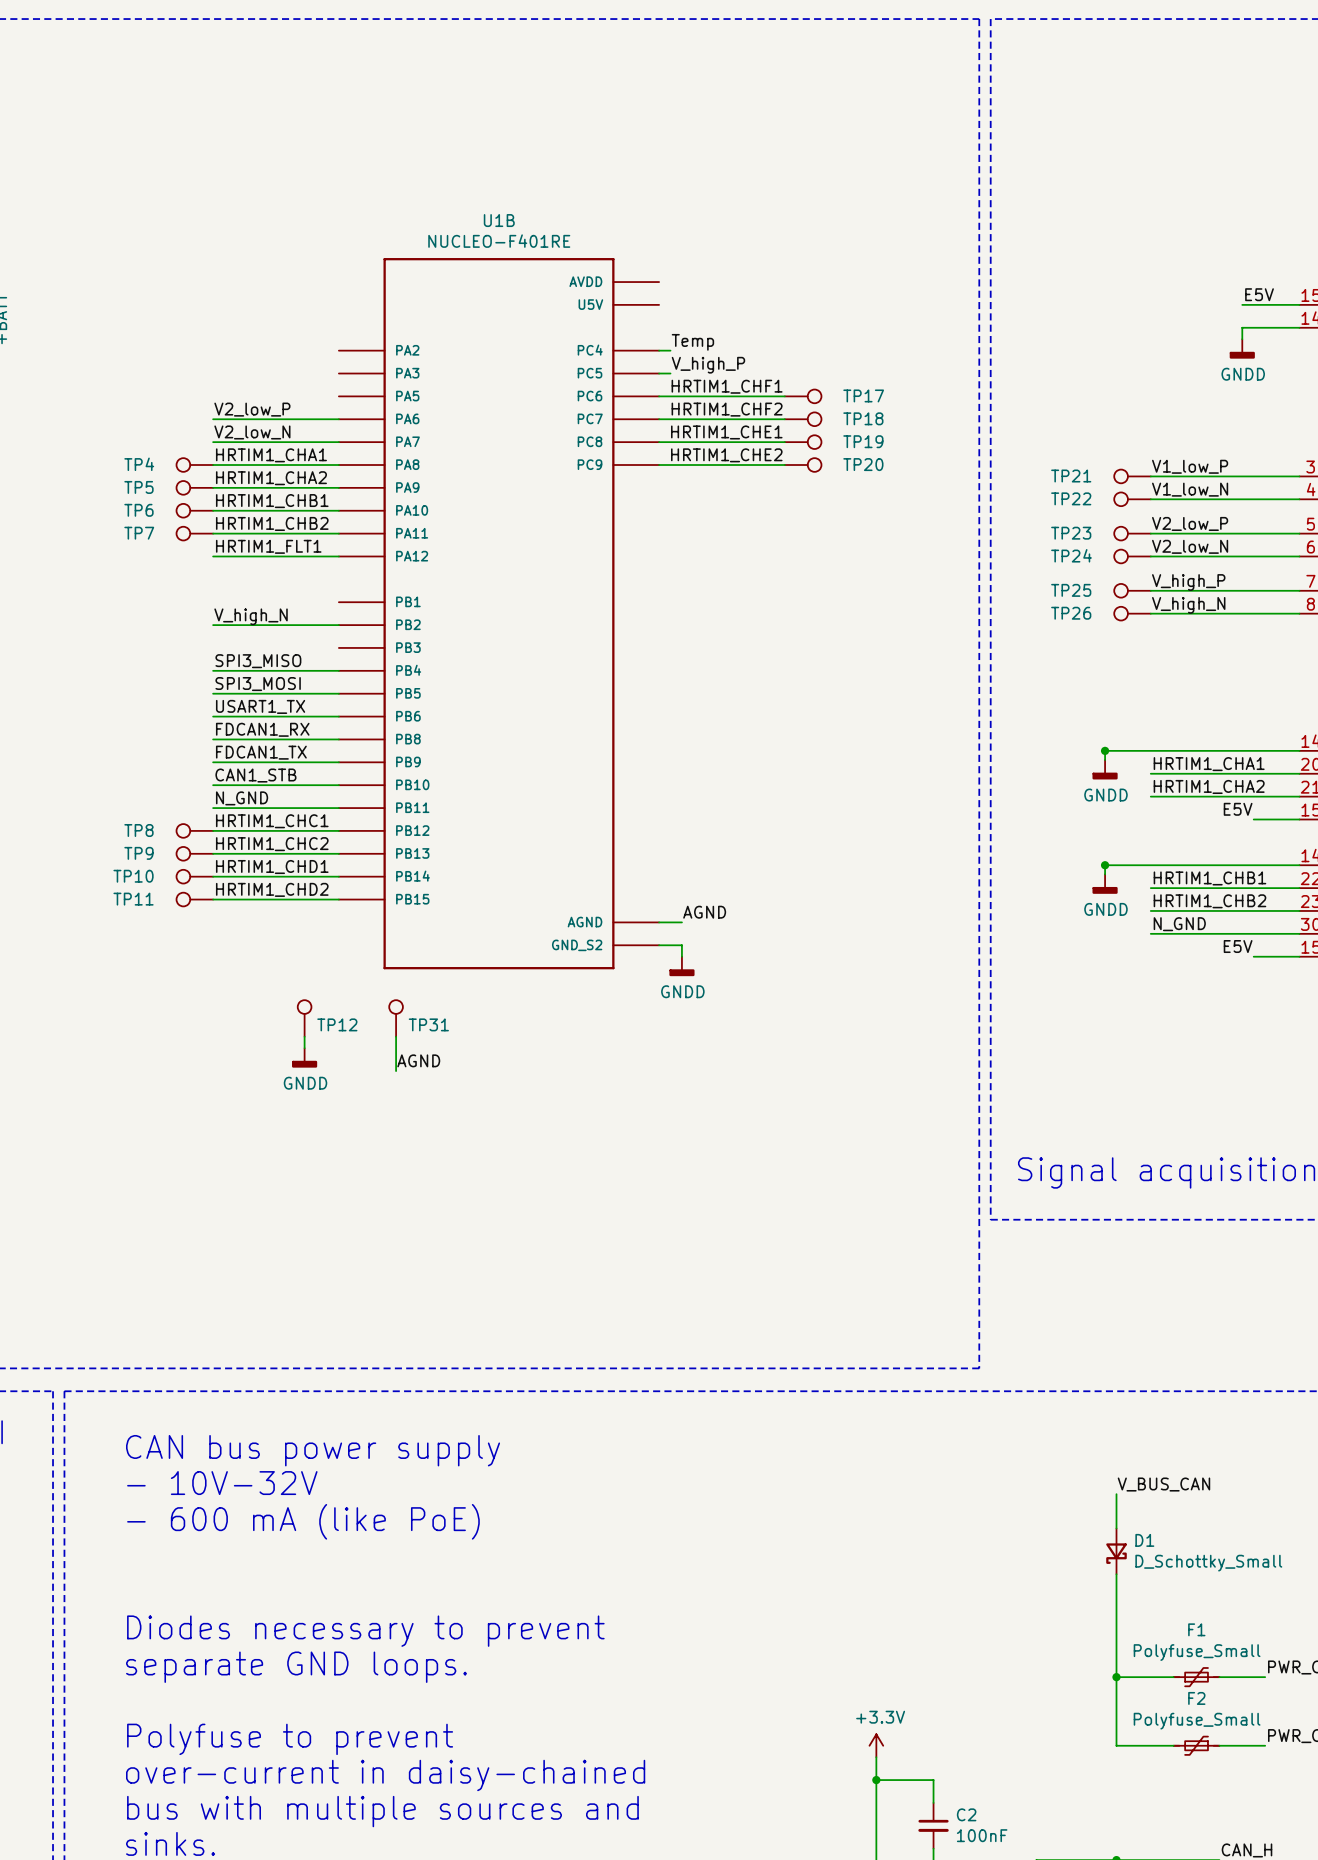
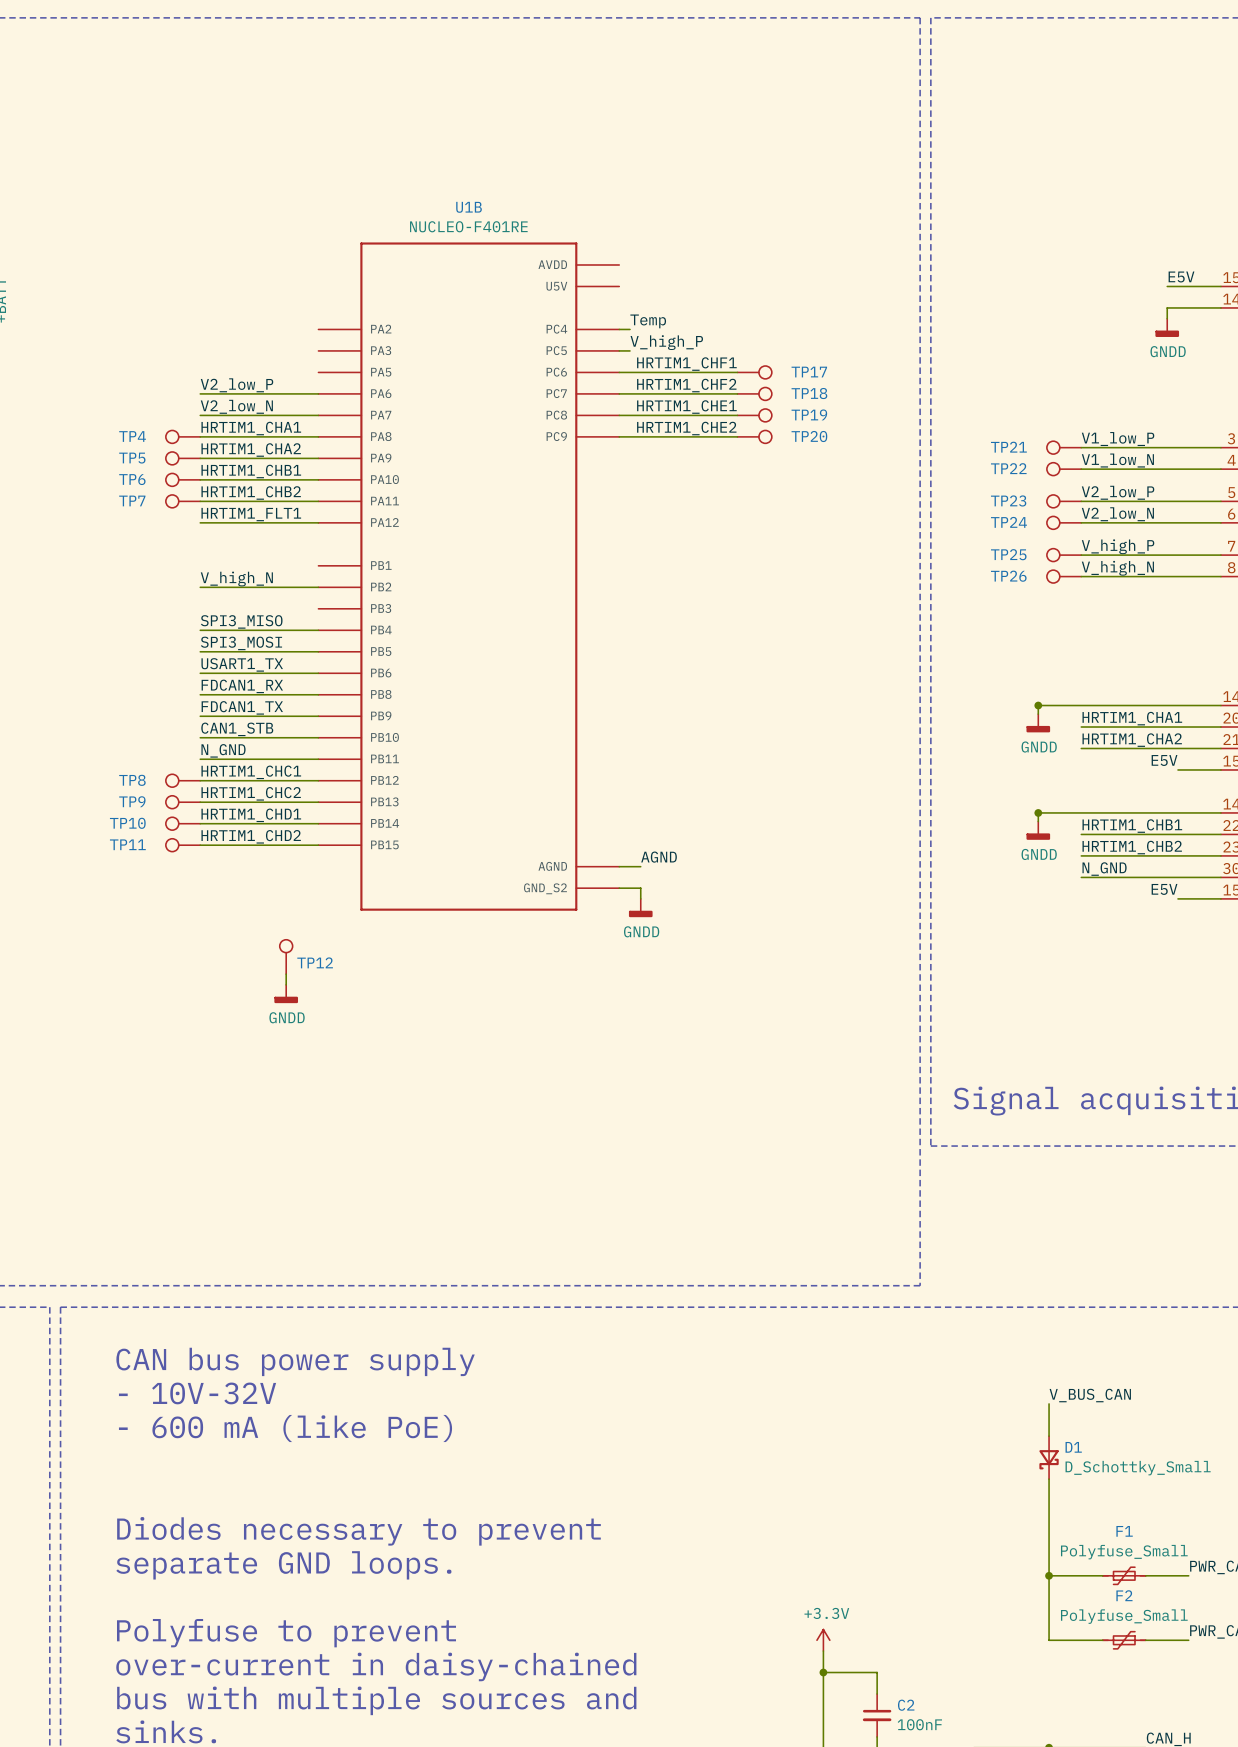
TP31: (396, 1018) -> none
wire: (396, 1036) (396, 1071) -> none
label: AGND (418, 1060) -> none

